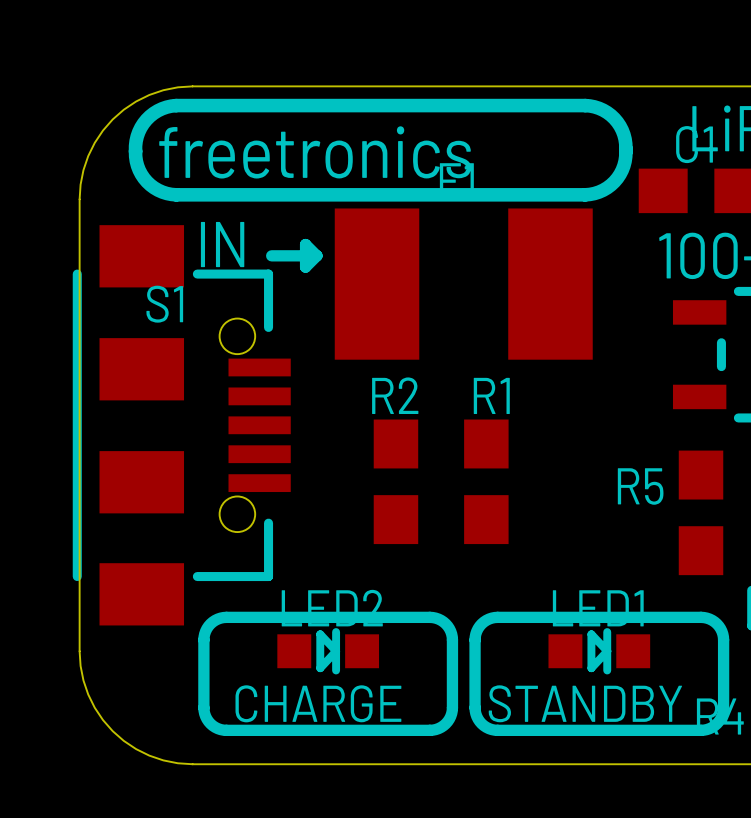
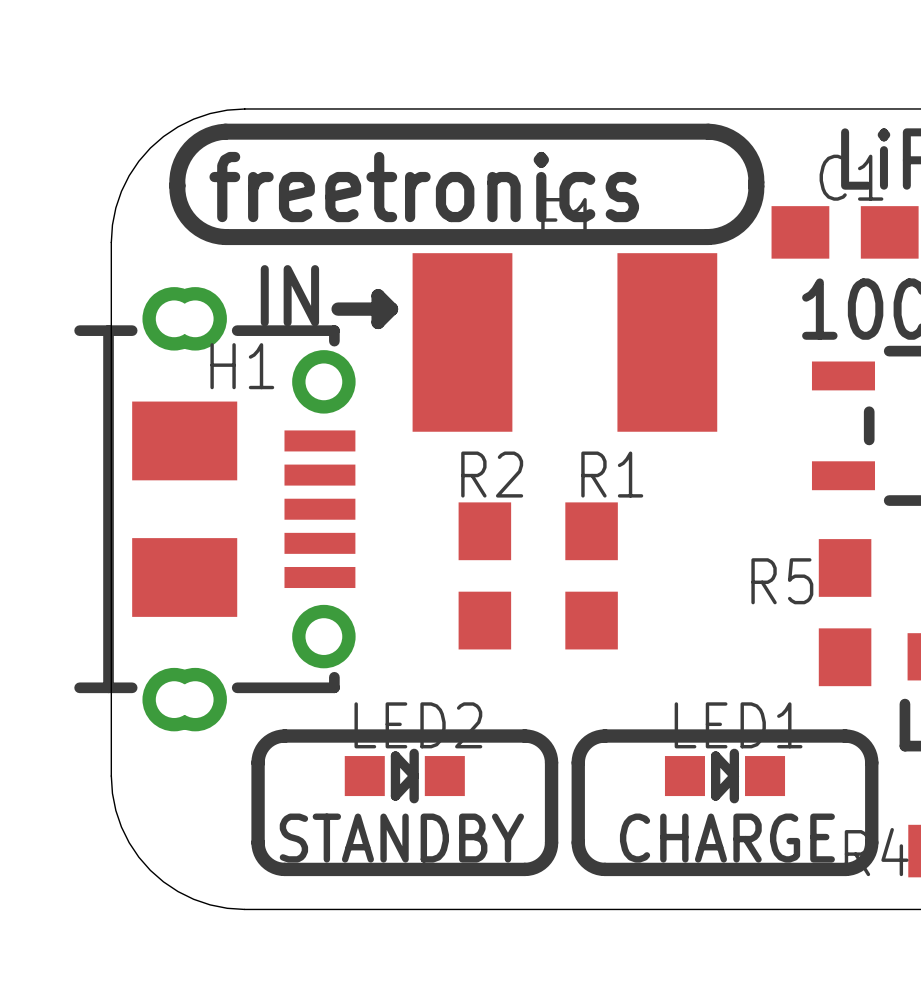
H1: none -> (214, 509)
S1: (181, 425) -> none
text: CHARGE (318, 703) -> STANDBY (401, 838)
text: STANDBY (585, 703) -> CHARGE (727, 838)

